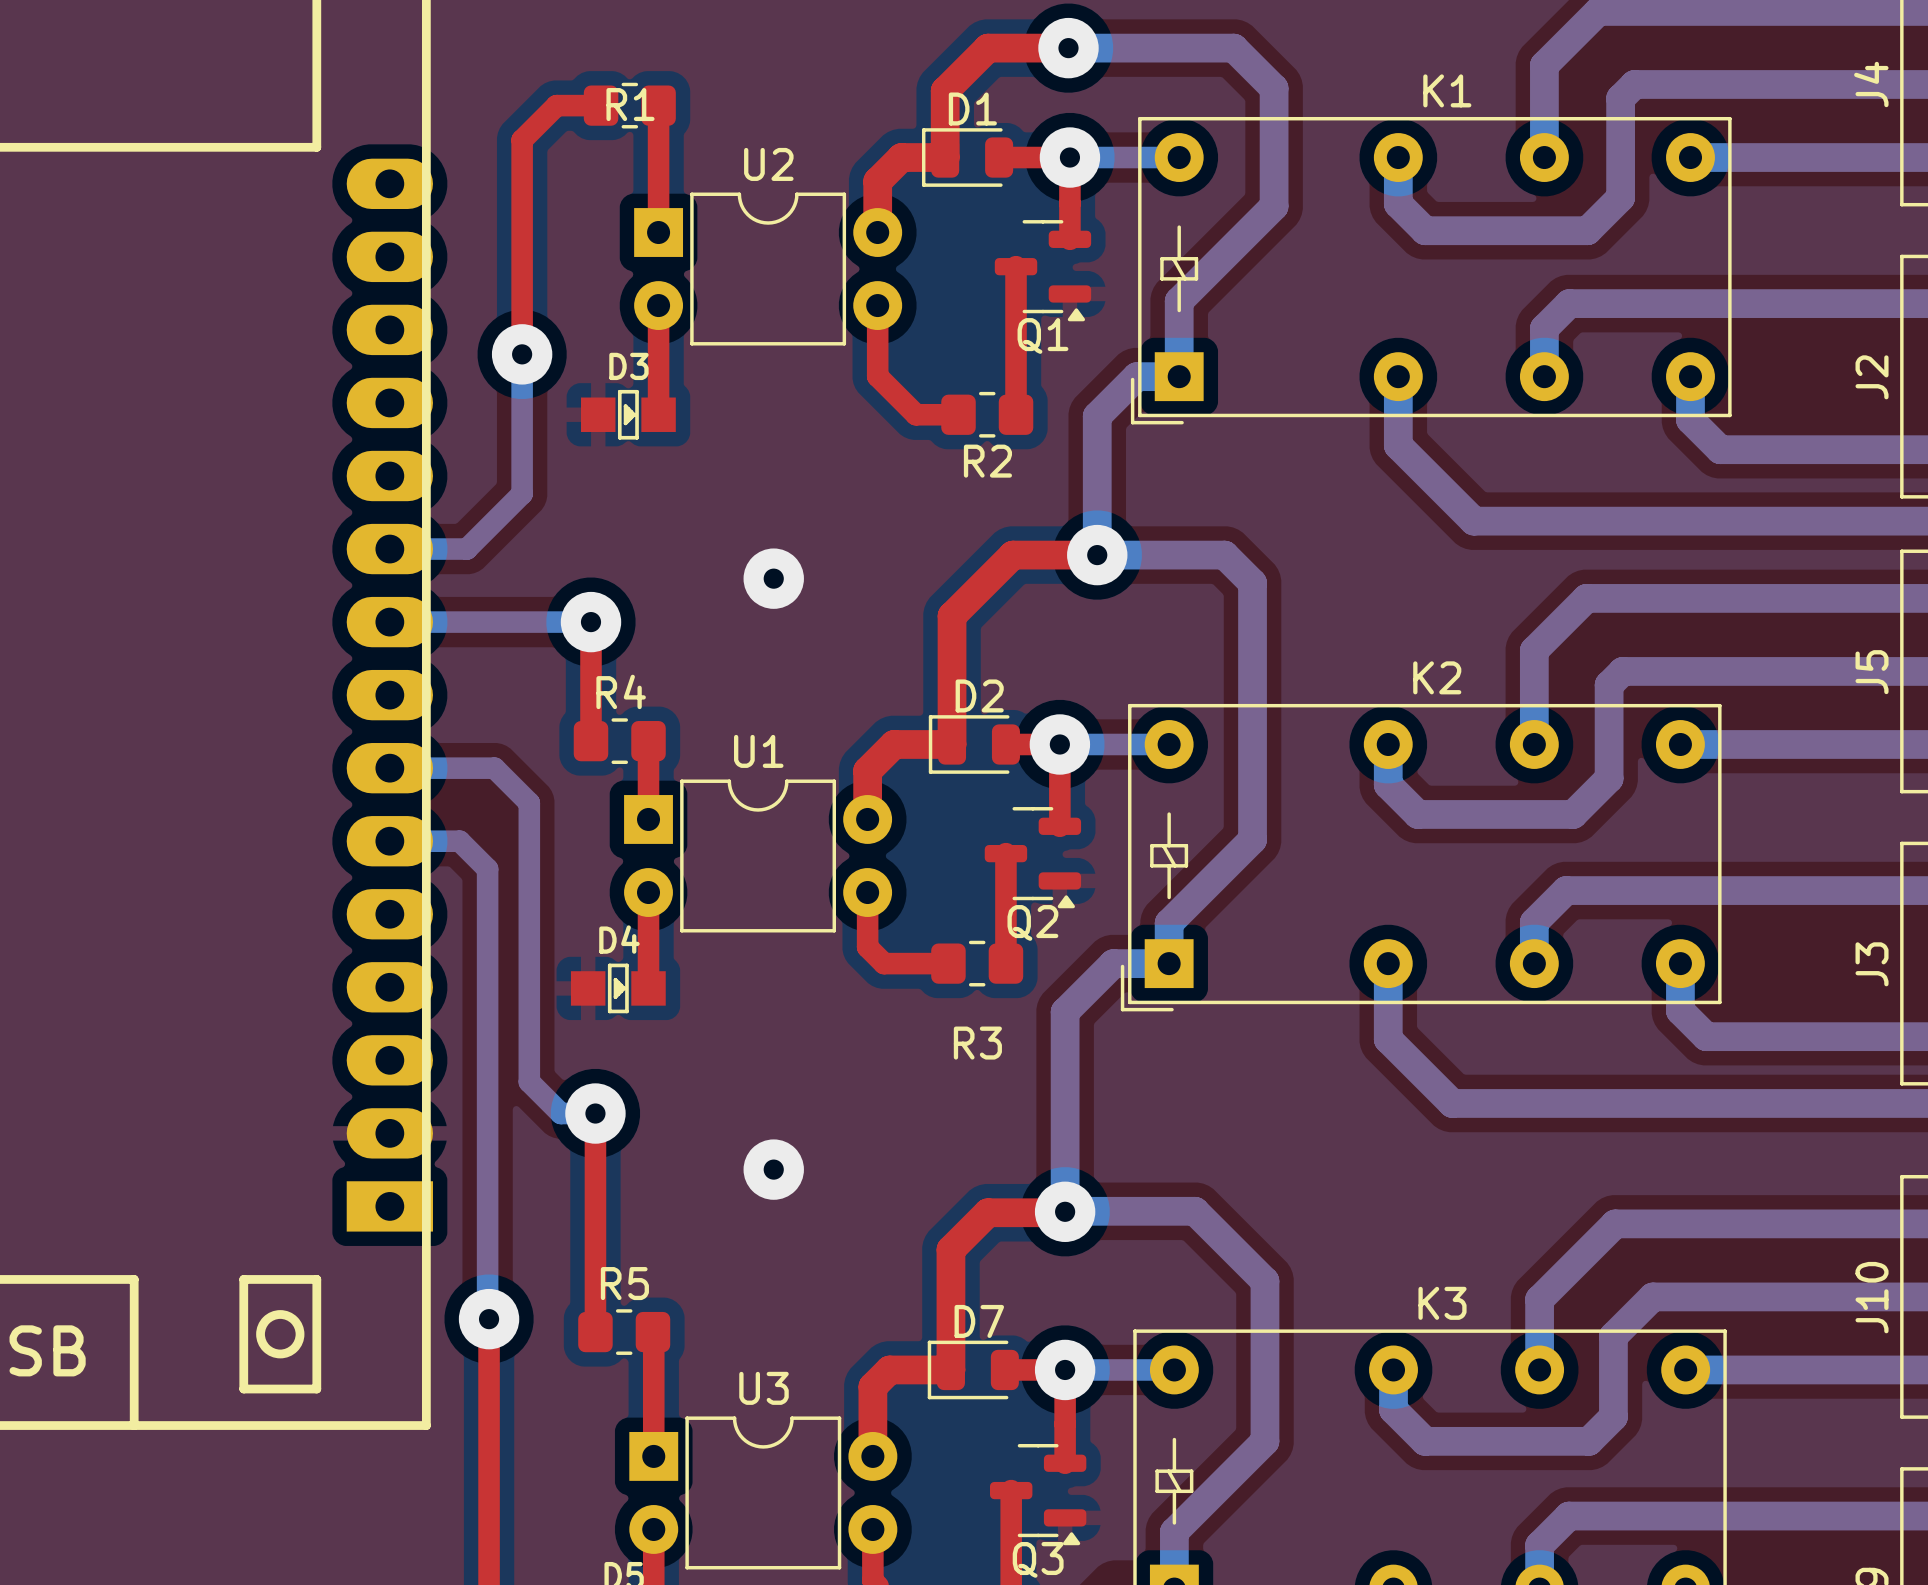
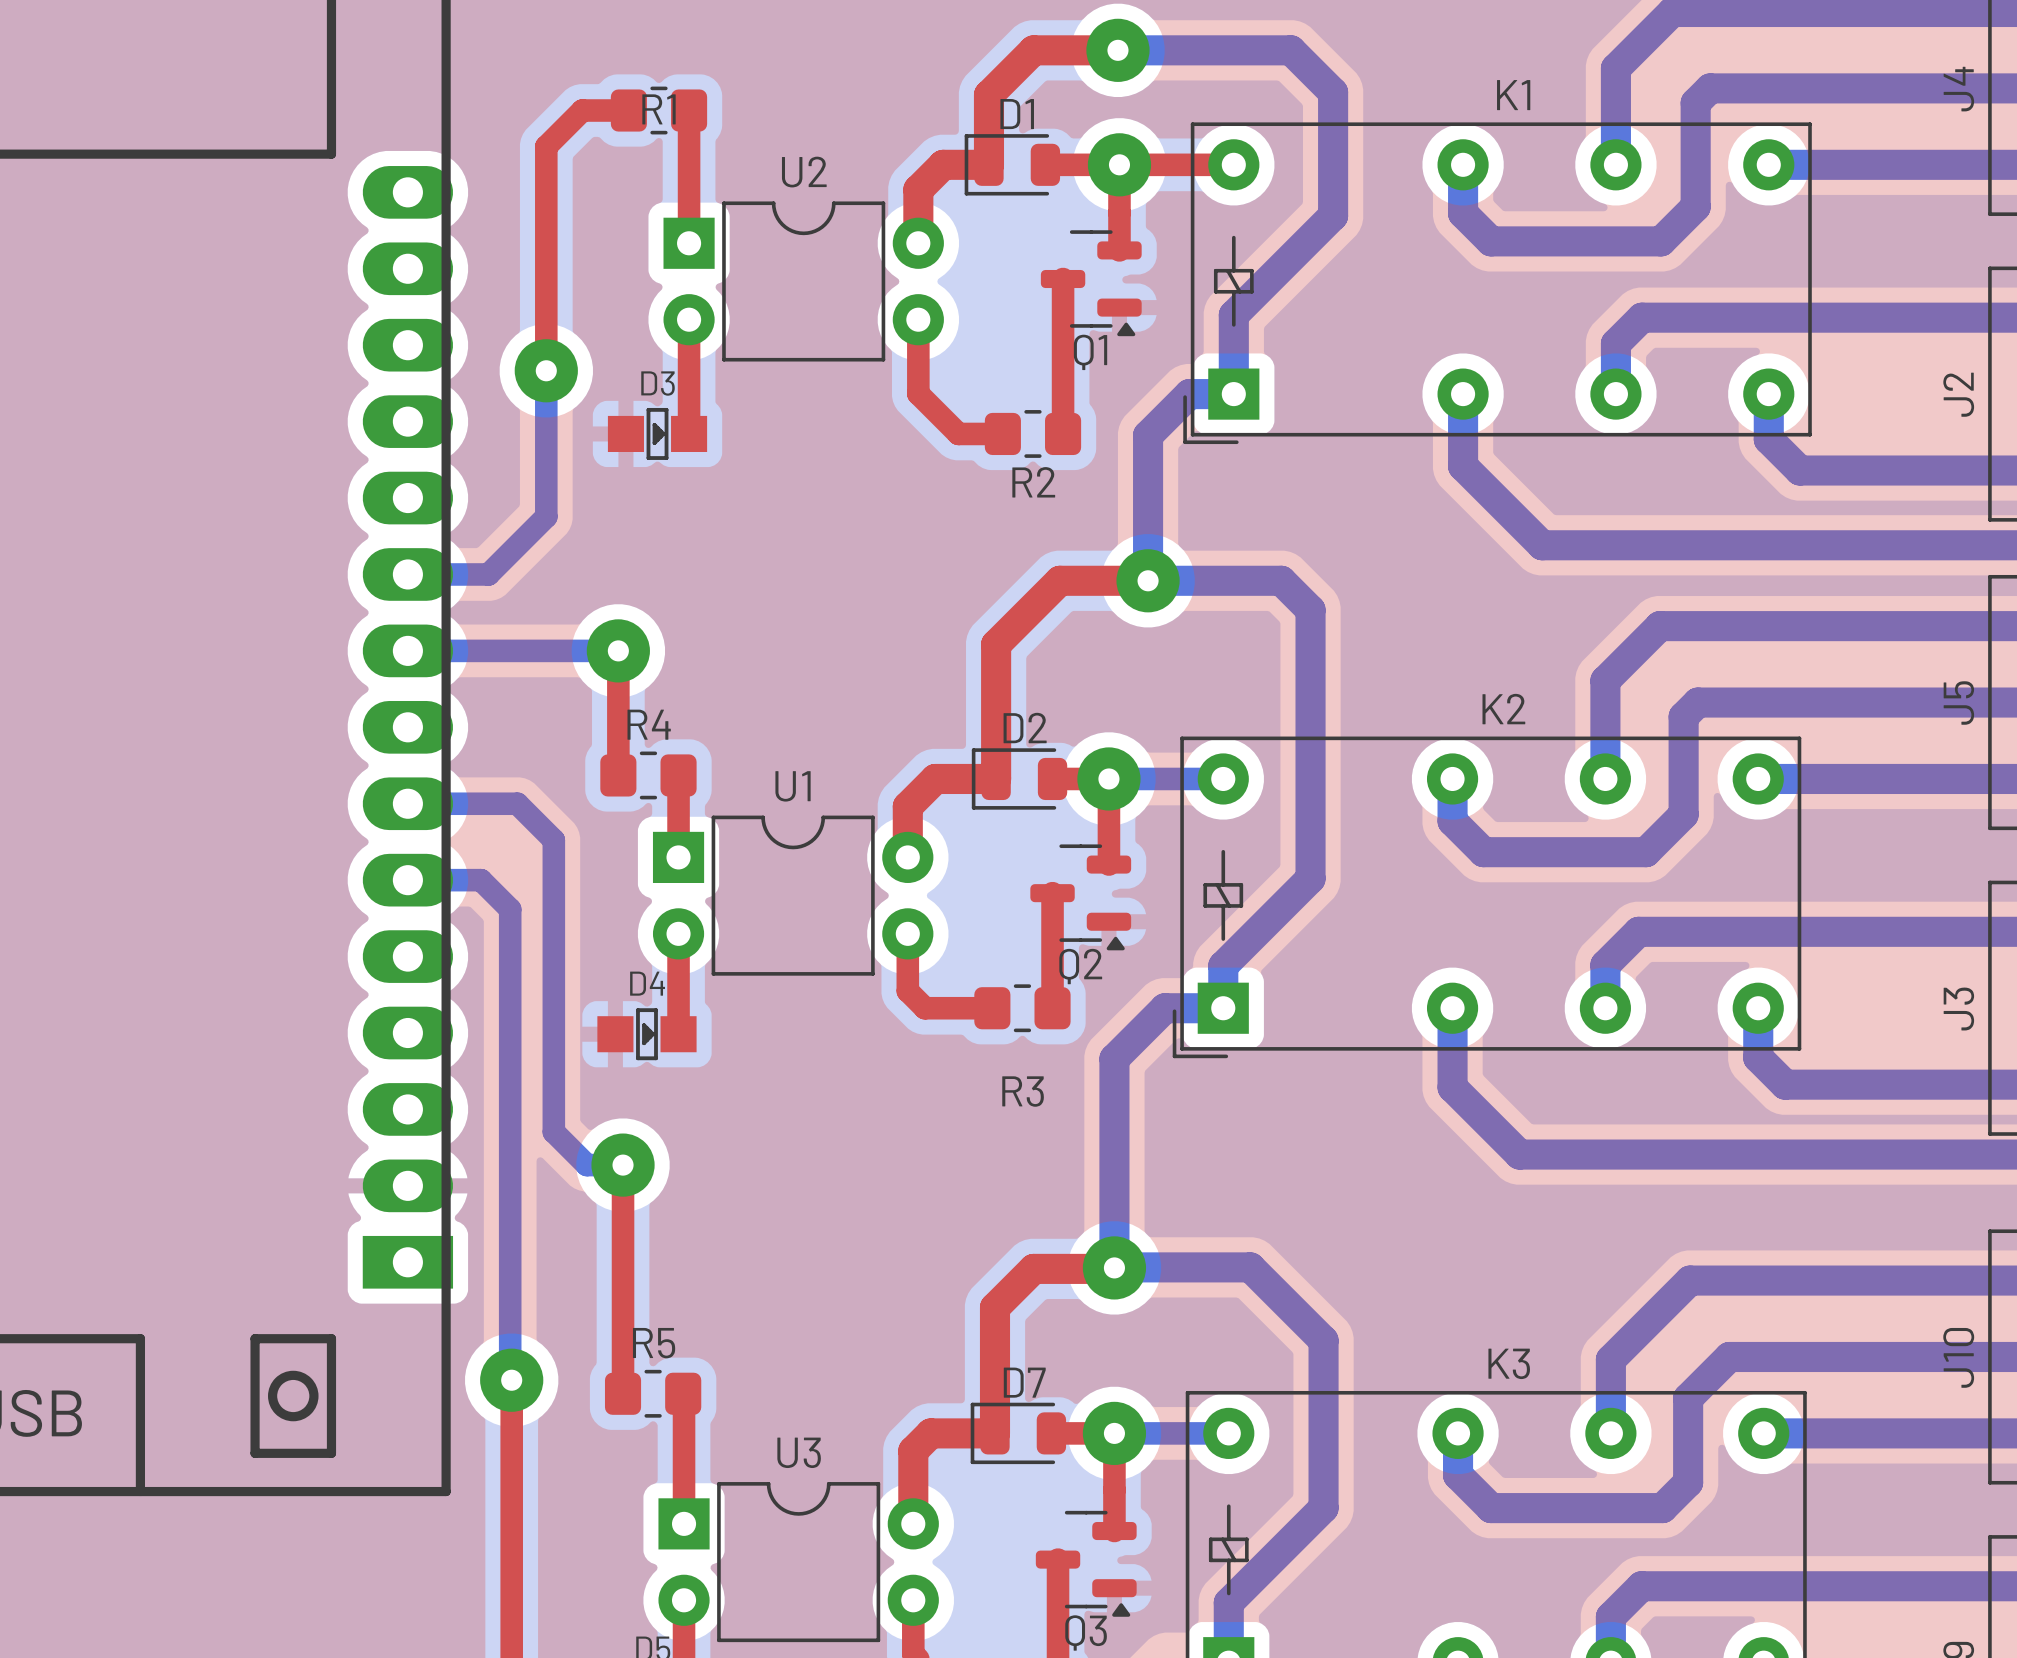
top track: none -> (1119, 164) (1233, 164)
bottom track: (1069, 157) (1179, 157) -> none
via: (773, 578) -> none
via: (773, 1169) -> none

